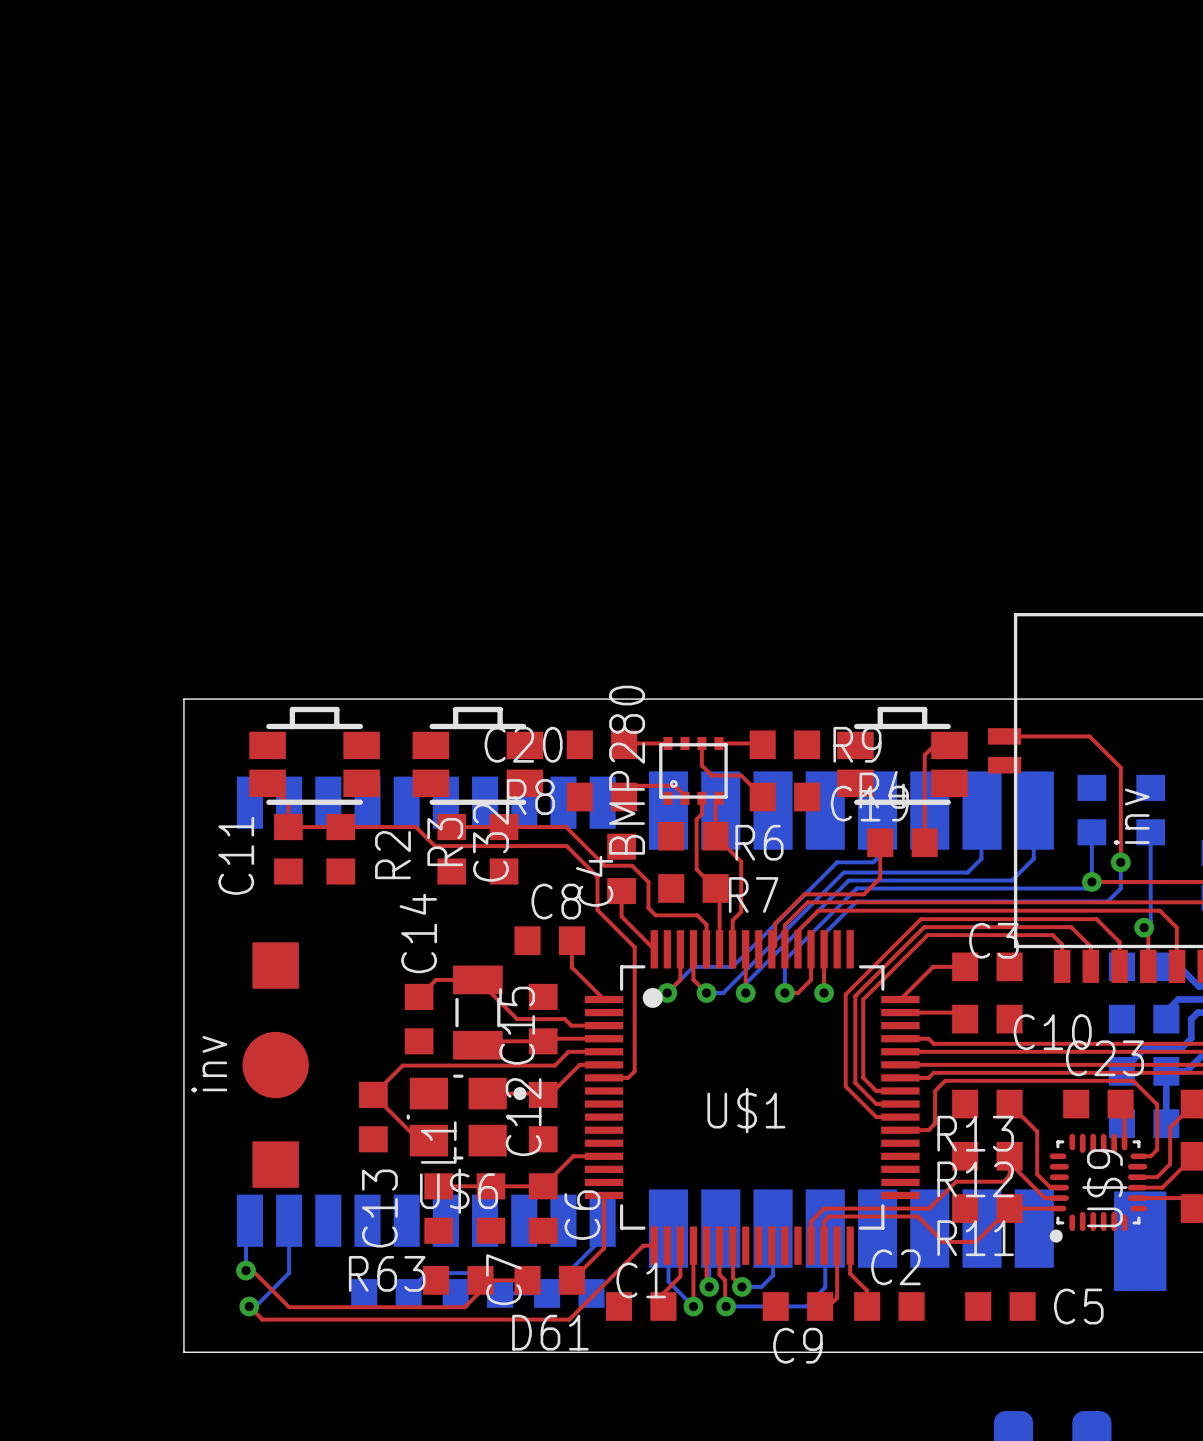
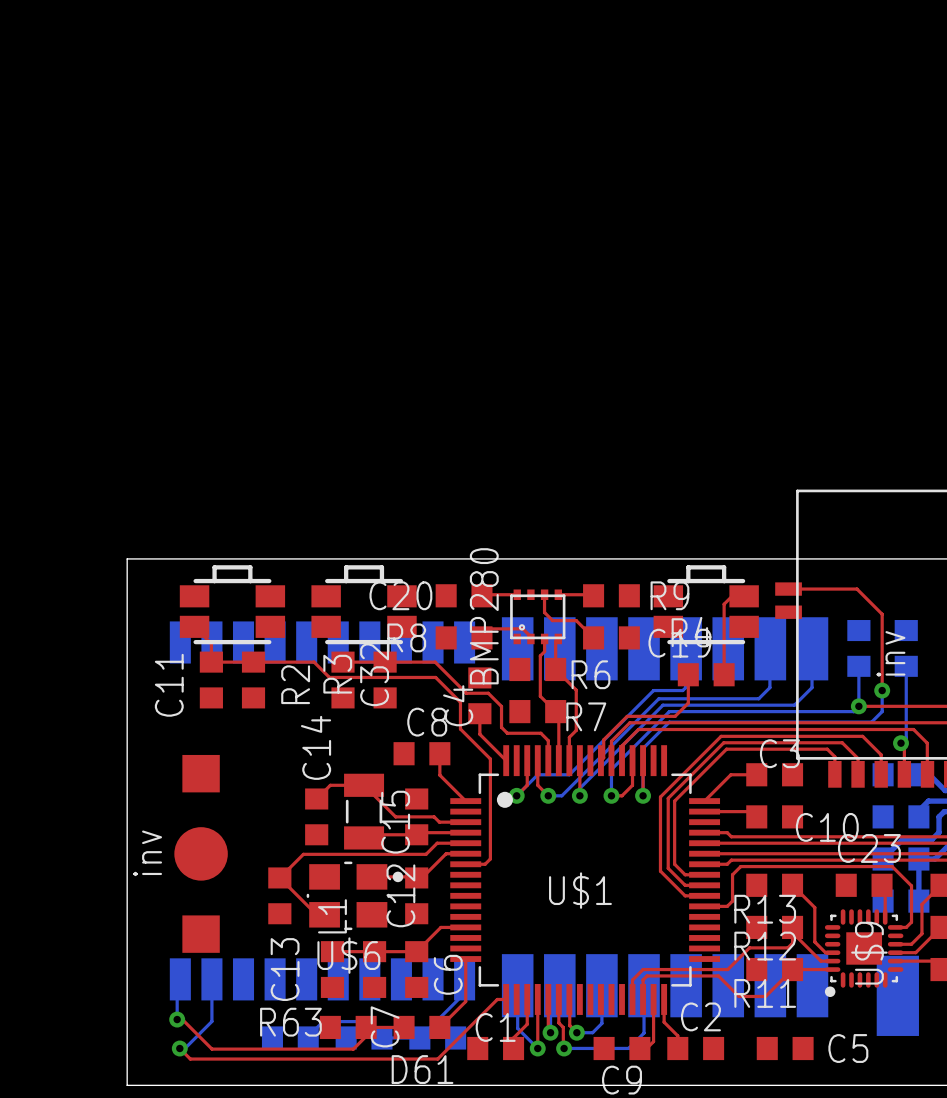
U$9 footprint: [1049, 1133, 1148, 1243] -> [824, 909, 904, 998]

